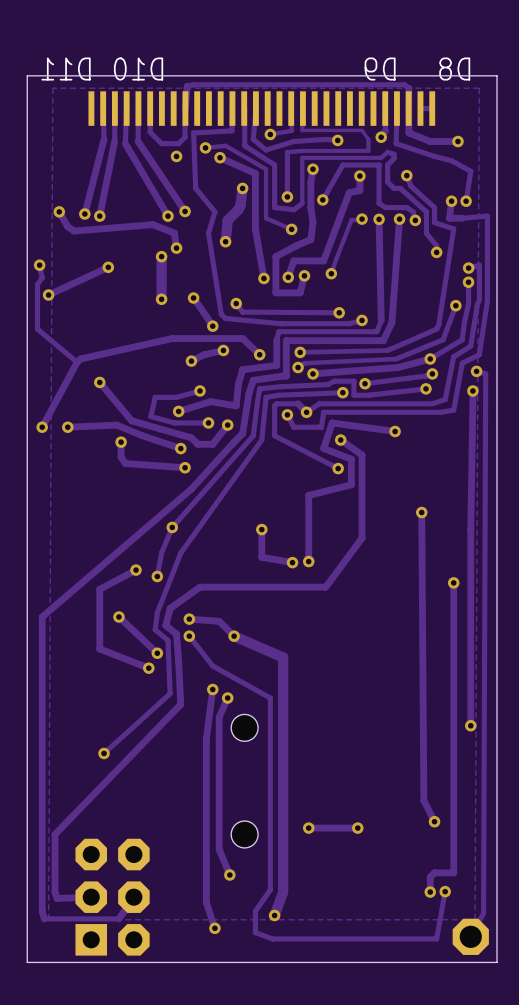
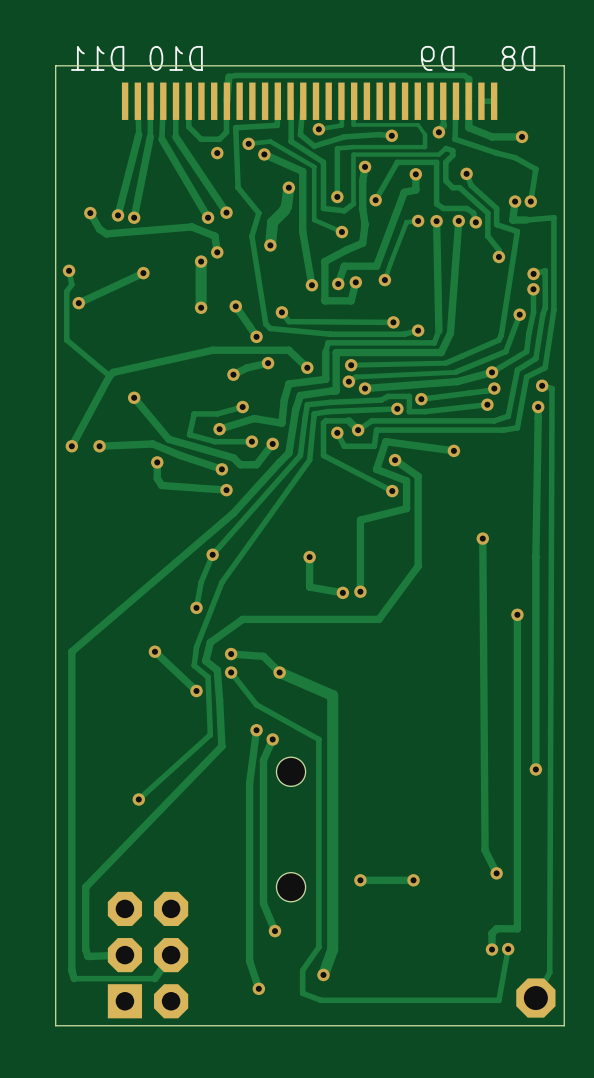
zone outline: (479, 88) (52, 88) (48, 919) (475, 919) (479, 88) -> none
track: (136, 570) (99, 589) (99, 648) (148, 668) -> none
via: (136, 570) -> none
via: (148, 668) -> none

